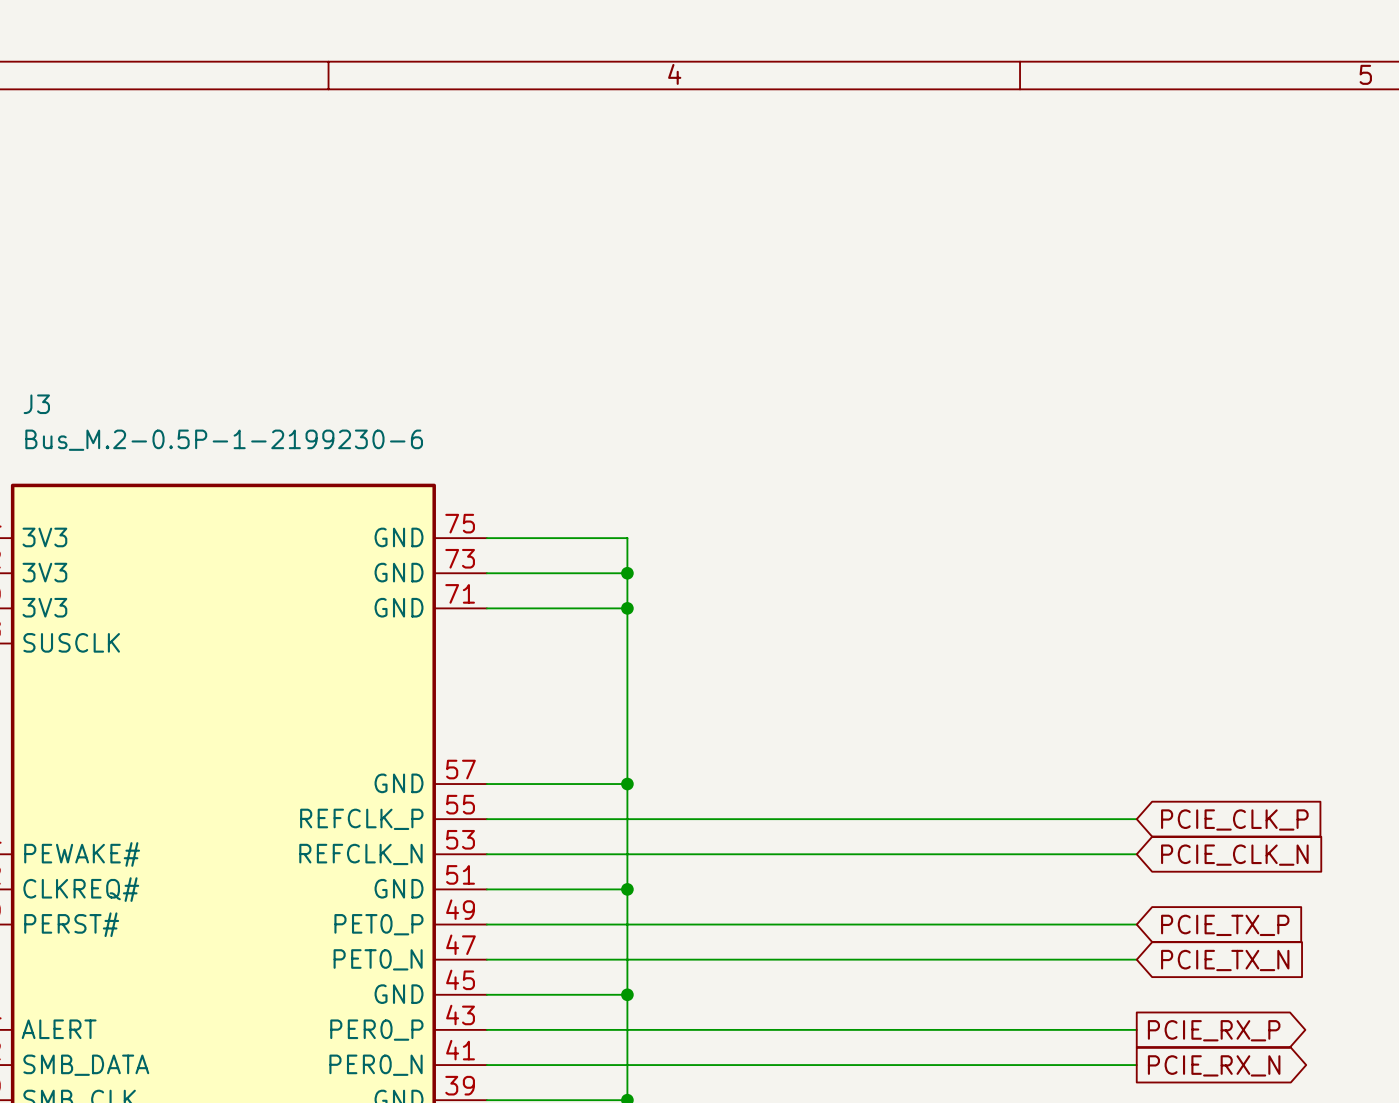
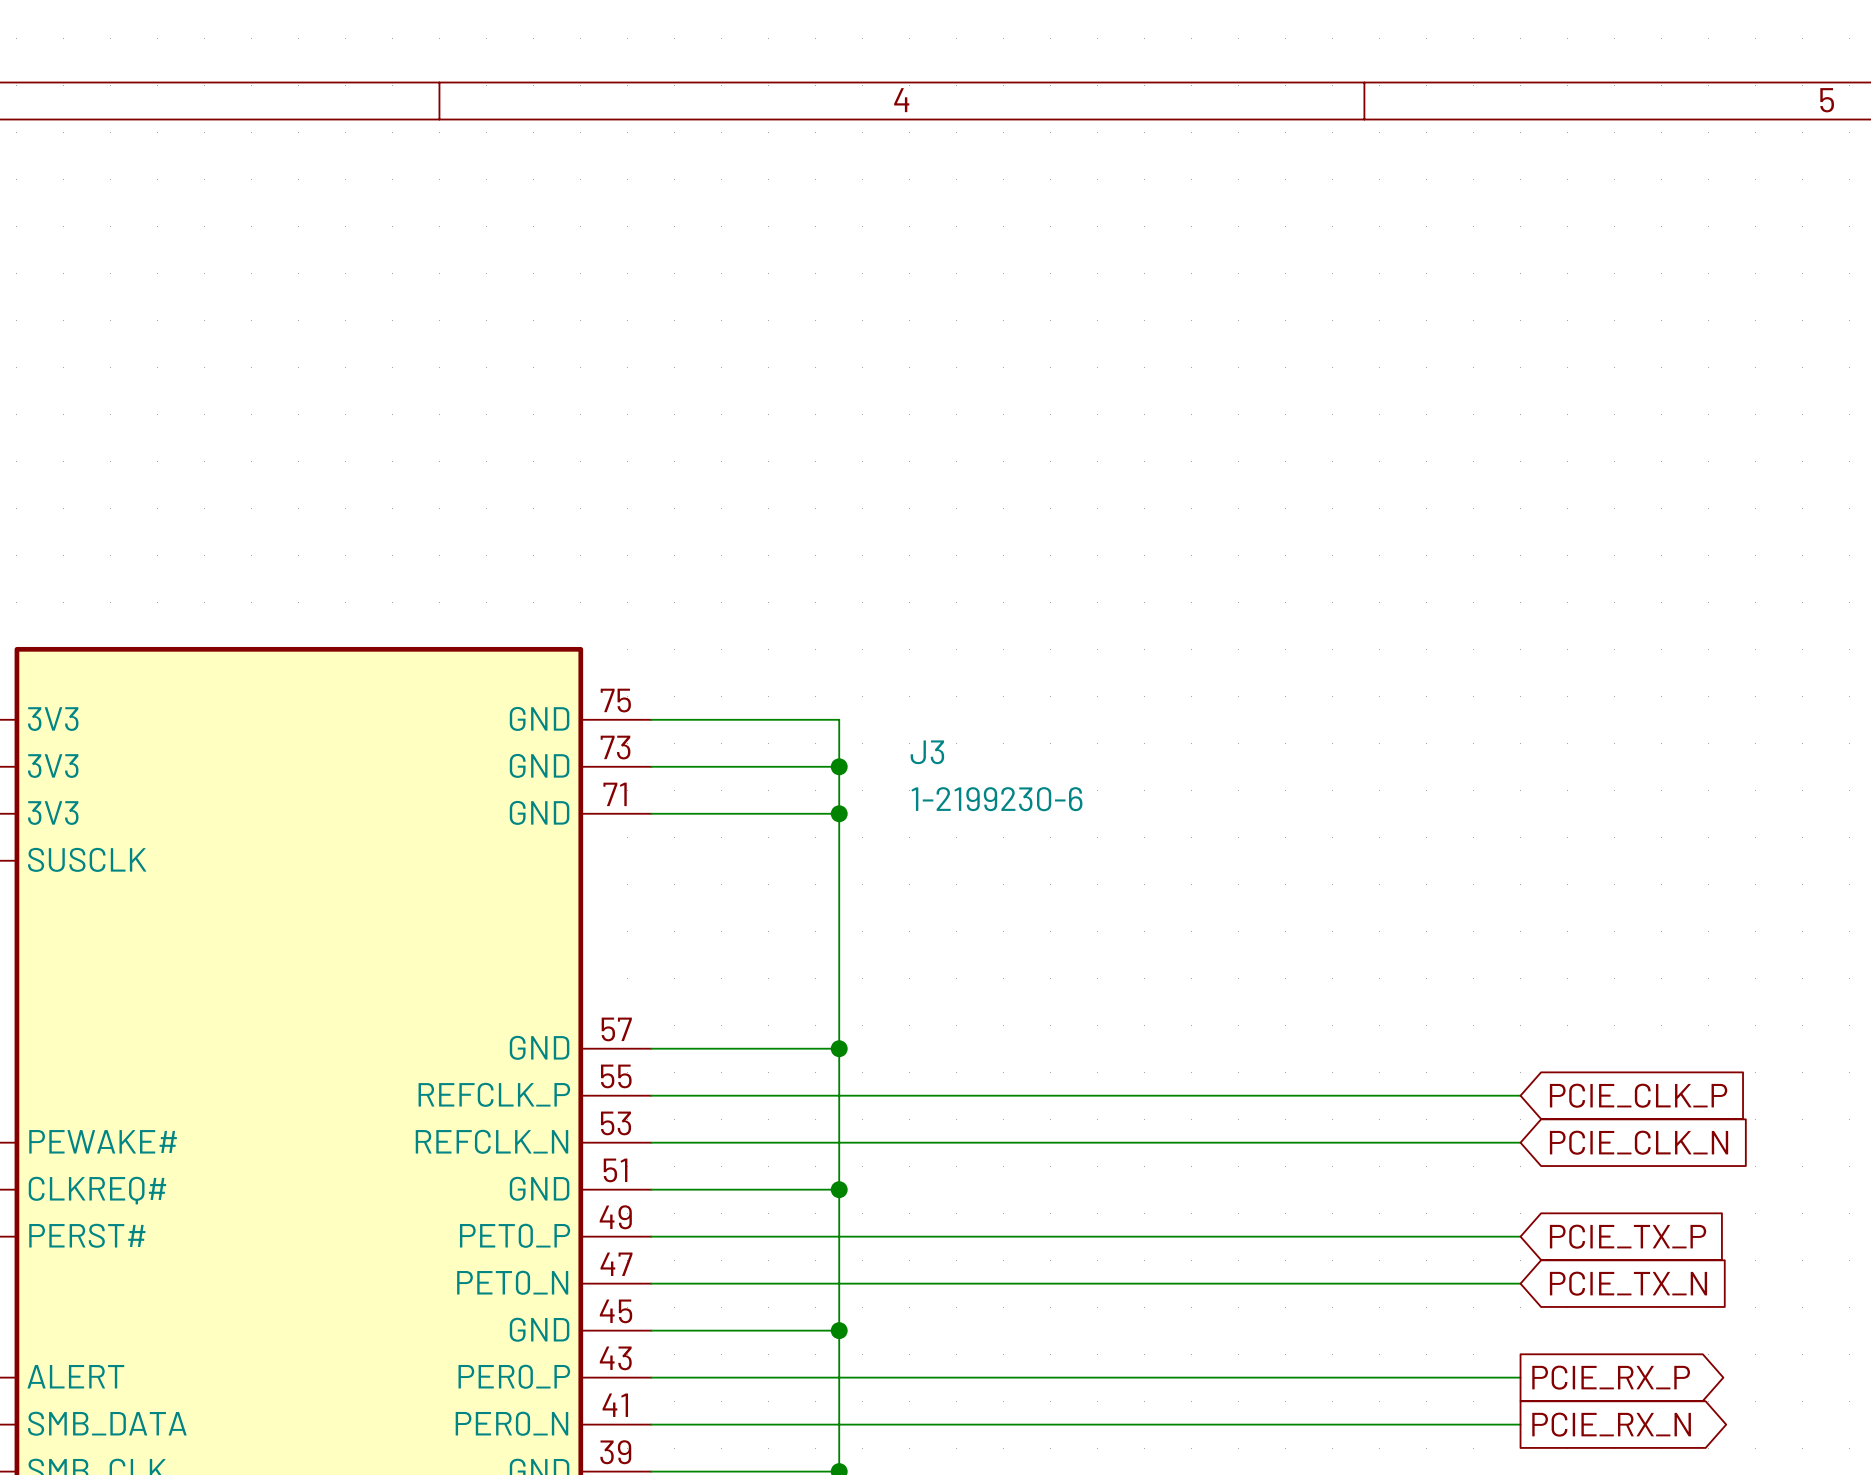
J3 name position: J3 (36, 404) -> J3 (927, 752)
J3 value: Bus_M.2-0.5P-1-2199230-6 (224, 440) -> 1-2199230-6 (997, 799)

